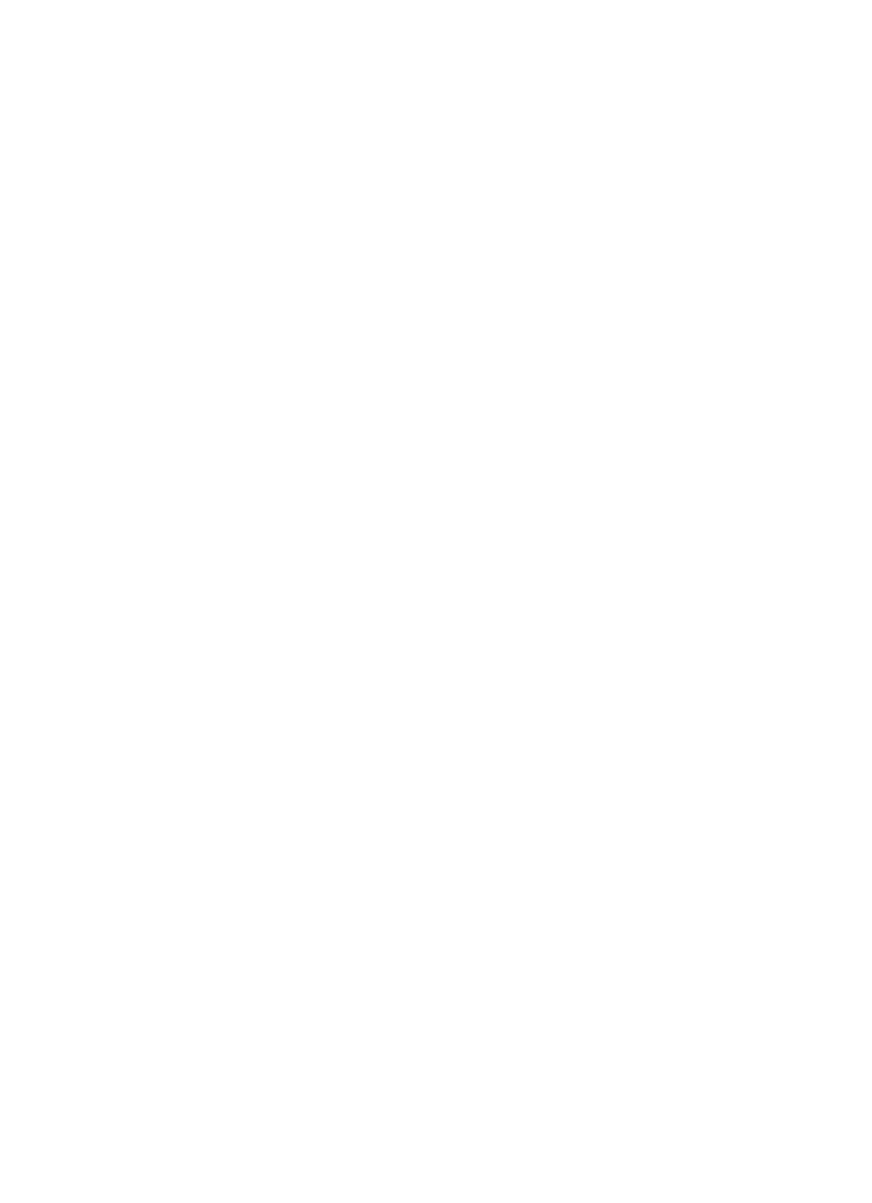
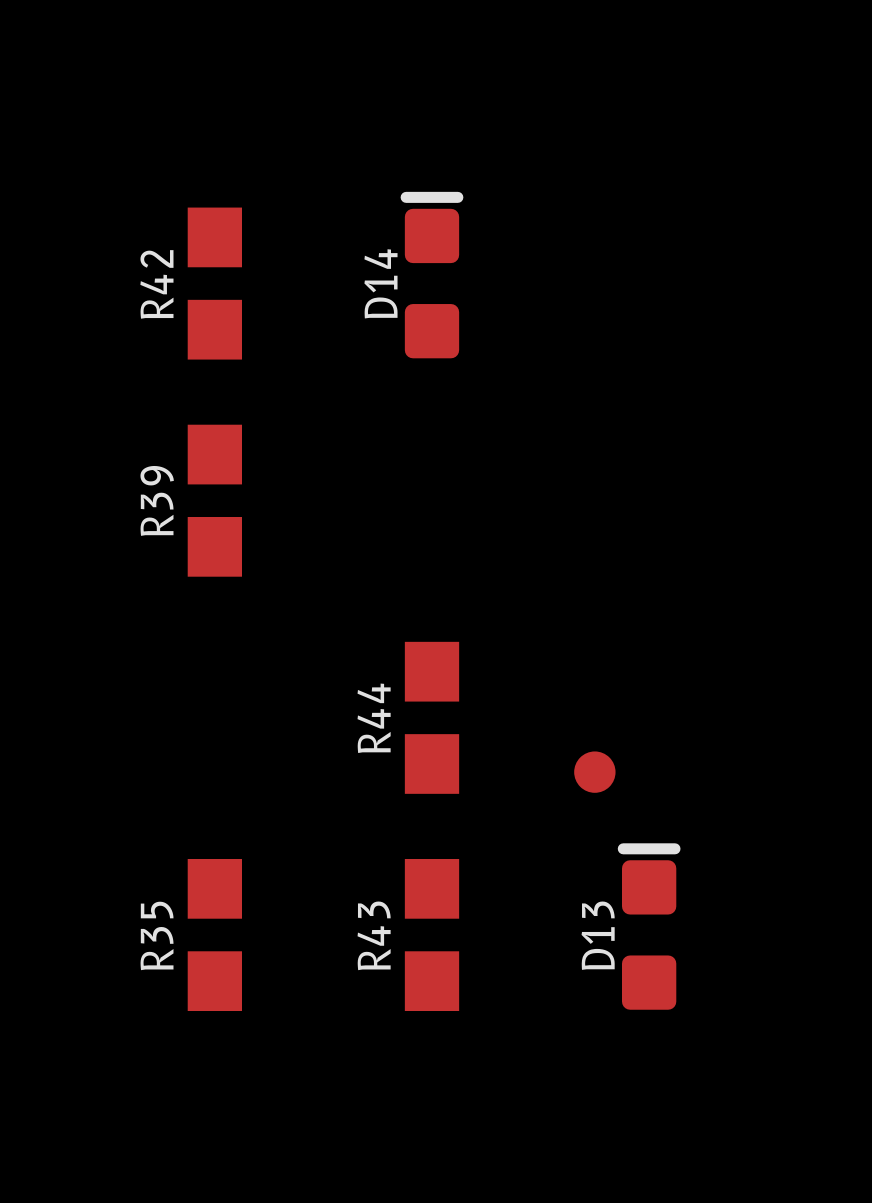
D14: none -> (432, 275)
R42: none -> (214, 283)
R39: none -> (214, 500)
R44: none -> (432, 717)
part: none -> (594, 772)
D13: none -> (649, 926)
R35: none -> (214, 934)
R43: none -> (432, 934)

